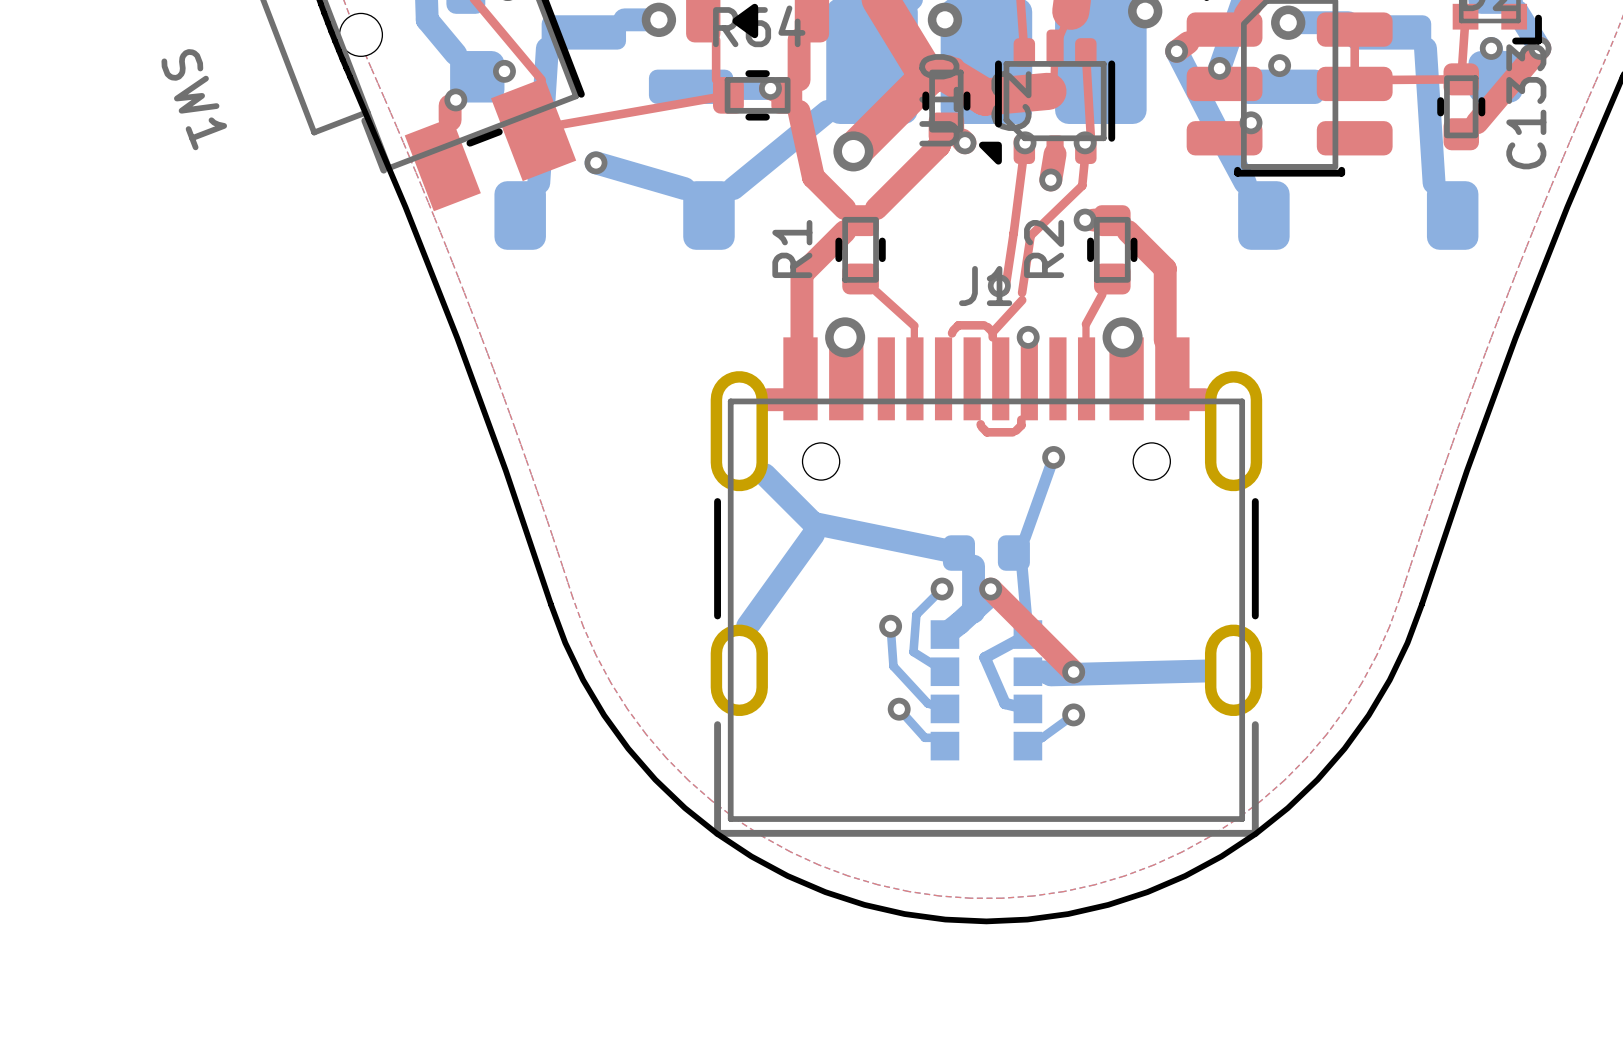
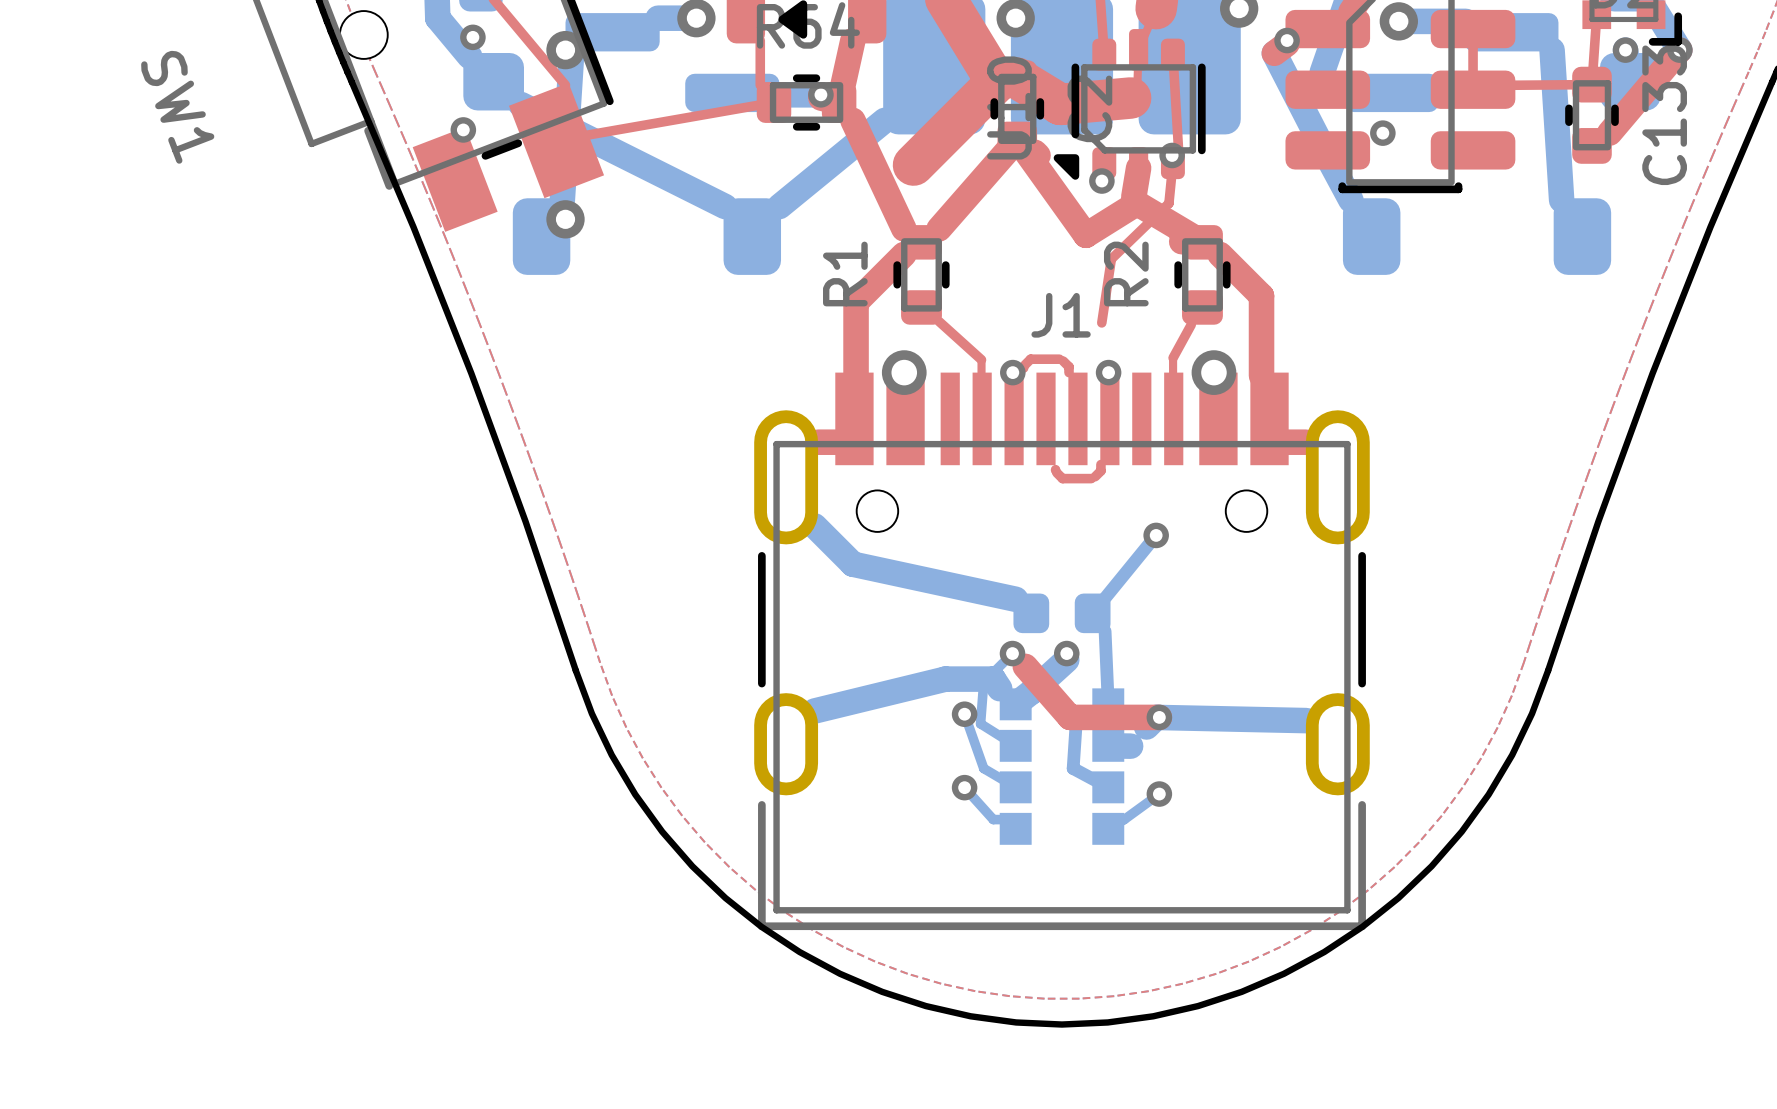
via: none -> (472, 37)
top track: (799, 39) (799, 79) -> (852, 40) (839, 102) (820, 98)
via: none -> (565, 50)
via position: (1176, 51) -> (1287, 40)
via: (1279, 65) -> none
via: (1219, 68) -> none
via: (504, 71) -> none
via position: (455, 99) -> (463, 129)
top track: (450, 105) (450, 119) -> none
top track: (799, 111) (813, 177) (844, 208) -> (852, 120) (903, 228)
via position: (1251, 122) -> (1382, 133)
top track: (946, 128) (939, 145) (876, 208) -> (1202, 242) (1137, 203) (1085, 235) (1017, 139) (939, 228)
via: (964, 142) -> none
via position: (1025, 142) -> (1101, 181)
top track: (1024, 149) (1005, 290) (999, 285) -> none
via: (853, 151) -> none
bottom track: (595, 162) (684, 188) -> (520, 104) (725, 206)
via: (595, 162) -> none
via: (1050, 180) -> none
via: none -> (565, 219)
via: (1085, 220) -> none
via: (999, 285) -> none
top track: (1022, 300) (992, 332) -> none
via: none -> (1012, 372)
bottom track: (1053, 457) (1025, 537) -> none
via position: (1053, 457) -> (1156, 535)
bottom track: none -> (1156, 535) (1092, 613)
bottom track: (799, 508) (813, 523) (958, 553) -> (852, 564) (1015, 599)
bottom track: (813, 534) (747, 626) -> none
bottom track: (973, 566) (973, 611) -> none
bottom track: (1022, 569) (1027, 634) (985, 657) (1005, 703) (1027, 708) -> (1105, 631) (1108, 704) (1076, 720) (1073, 768) (1108, 787)
top track: (990, 589) (1073, 672) -> none
top track: none -> (1025, 666) (1069, 717) (1159, 717)
bottom track: none -> (999, 688) (993, 679) (945, 679) (814, 711)
bottom track: (890, 626) (893, 666) (927, 703) (944, 708) -> (964, 714) (983, 768) (1015, 787)
via position: (890, 626) -> (964, 714)
bottom track: none -> (1306, 720) (1156, 717) (1146, 726)
bottom track: (1233, 670) (1050, 674) -> none
via position: (1073, 672) -> (1159, 717)

